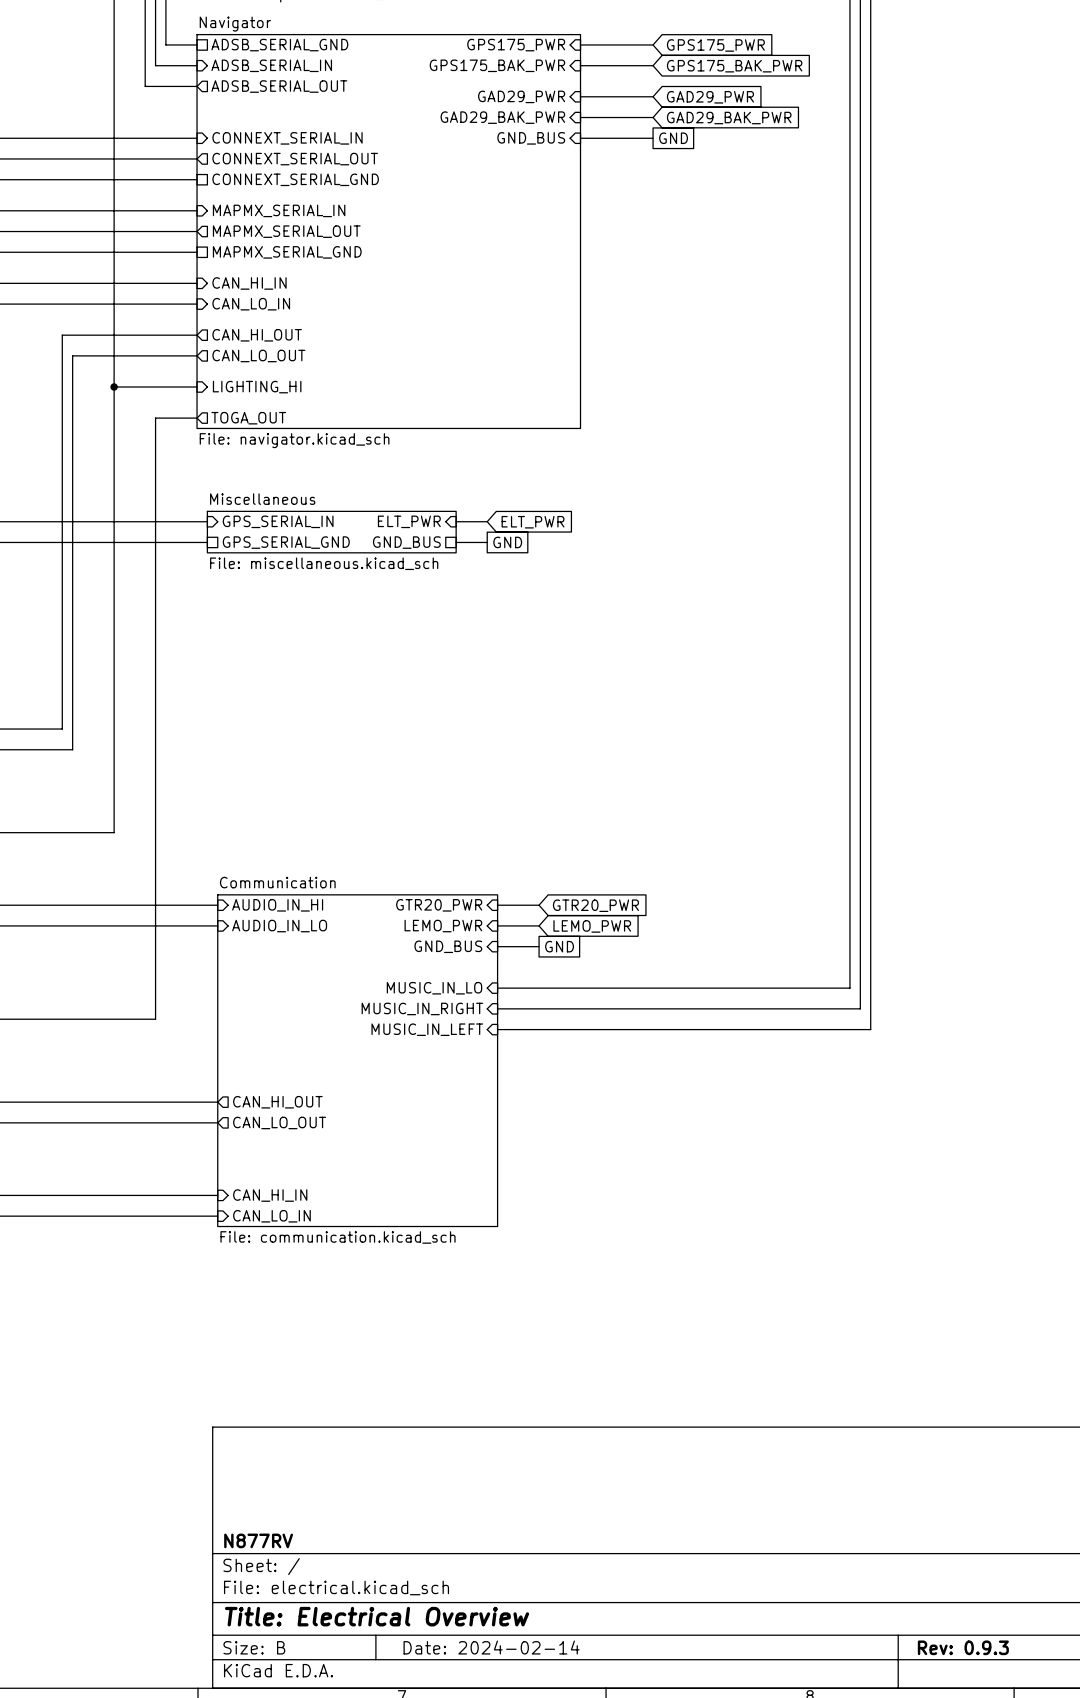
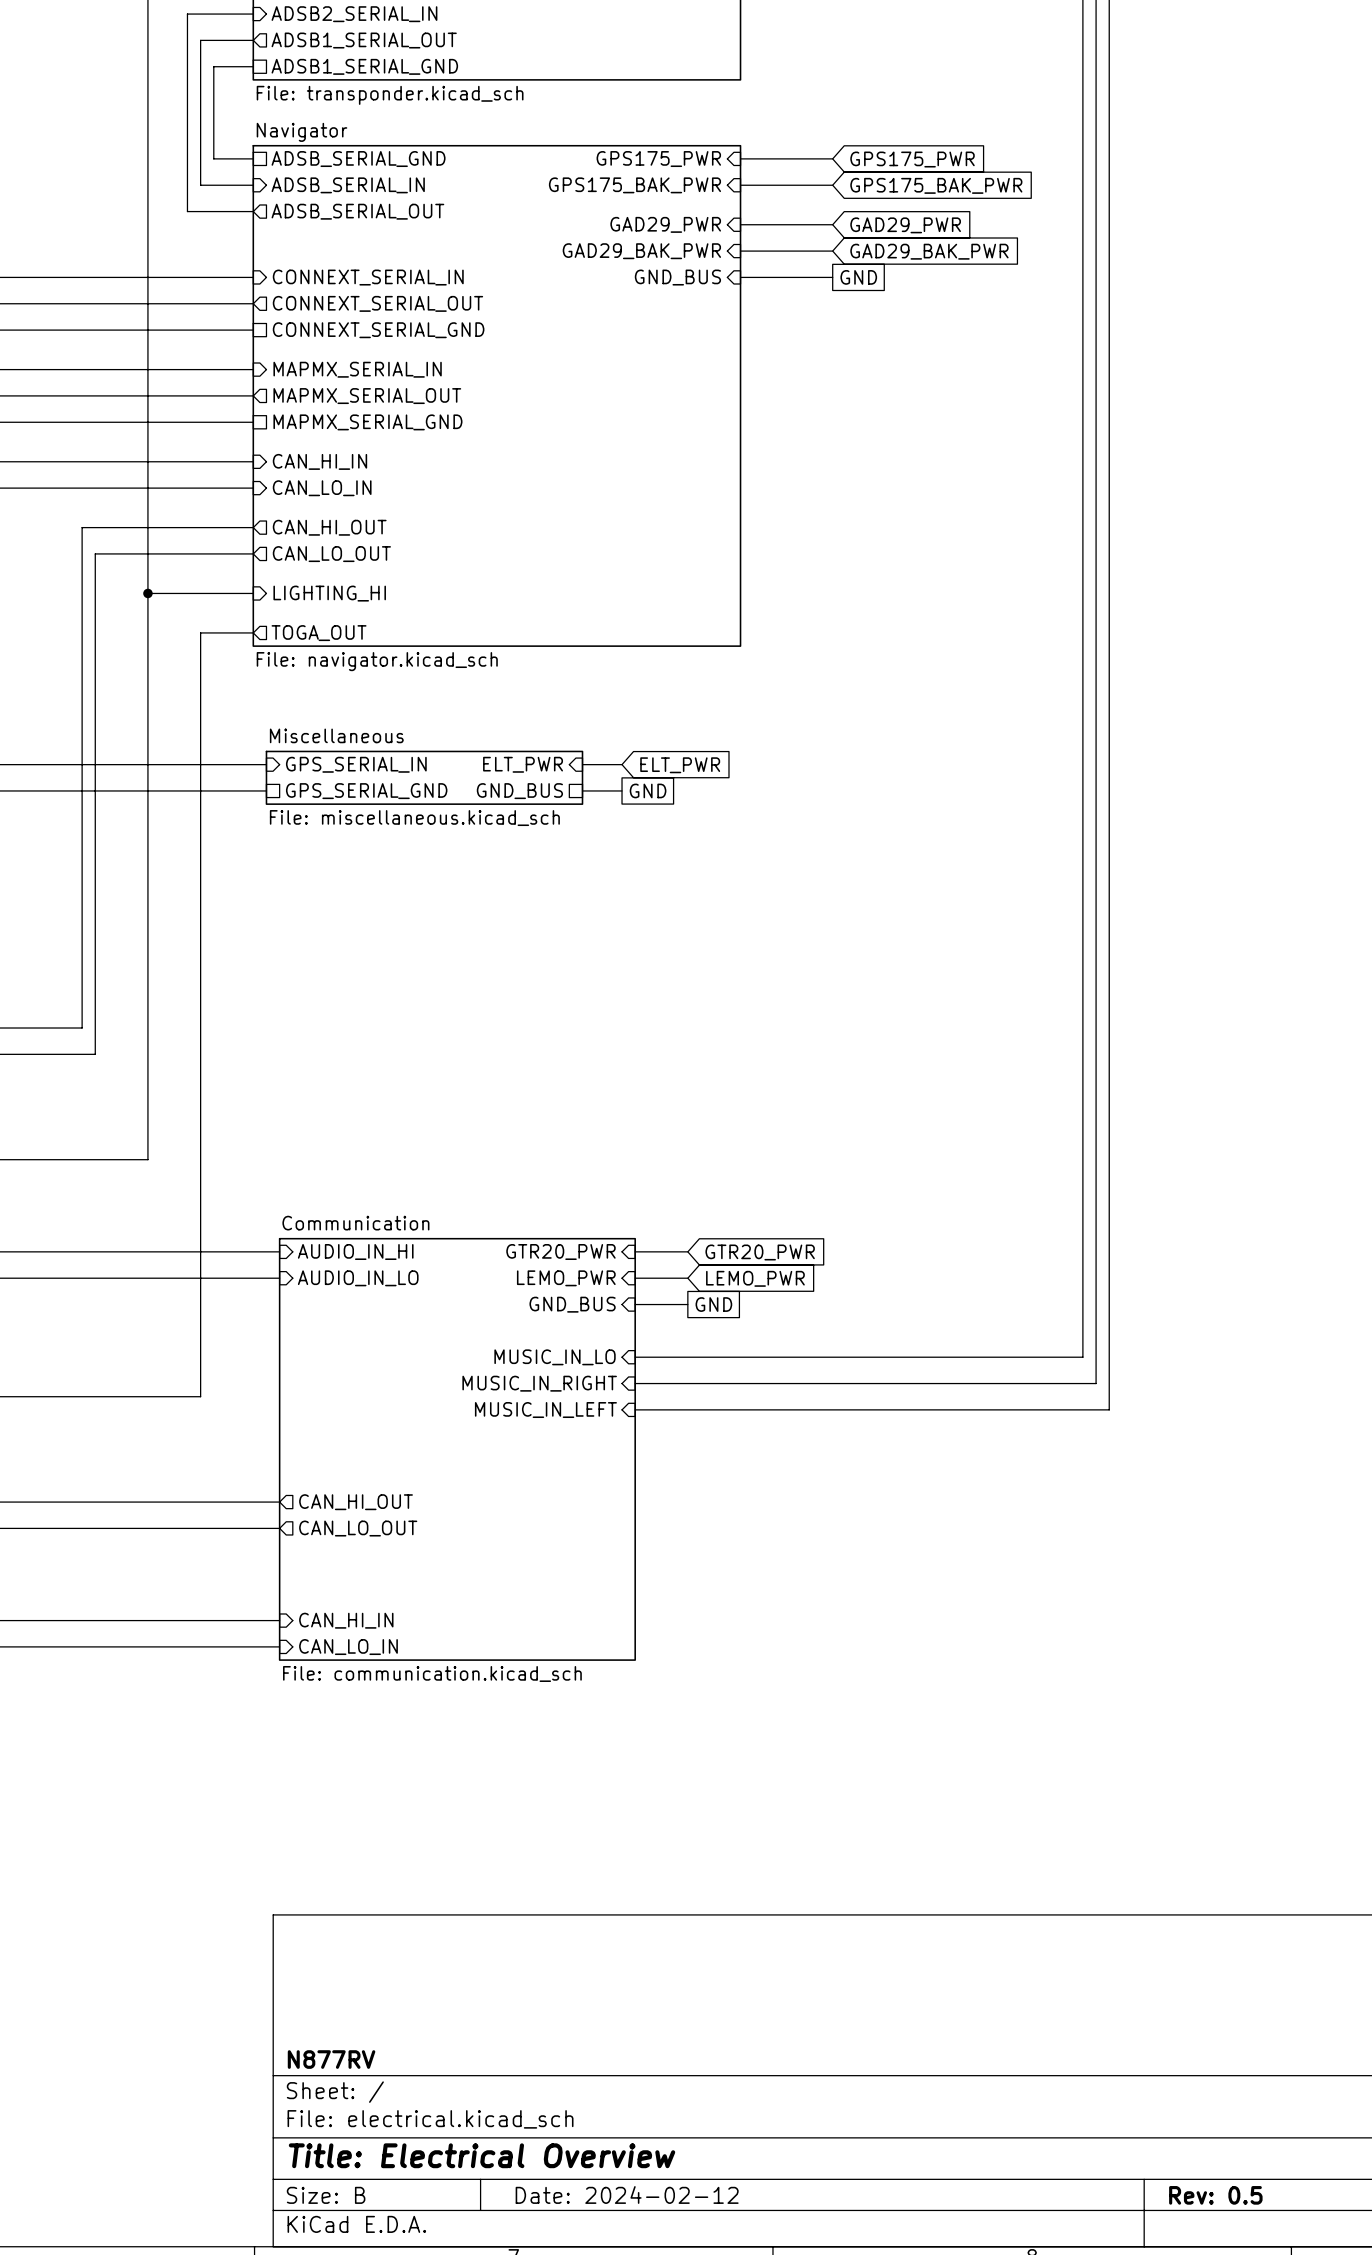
title block: Date: 2024-02-14 (491, 1647) -> Date: 2024-02-12 (627, 2194)
title block: Rev: 0.9.3 (963, 1647) -> Rev: 0.5 (1215, 2195)

